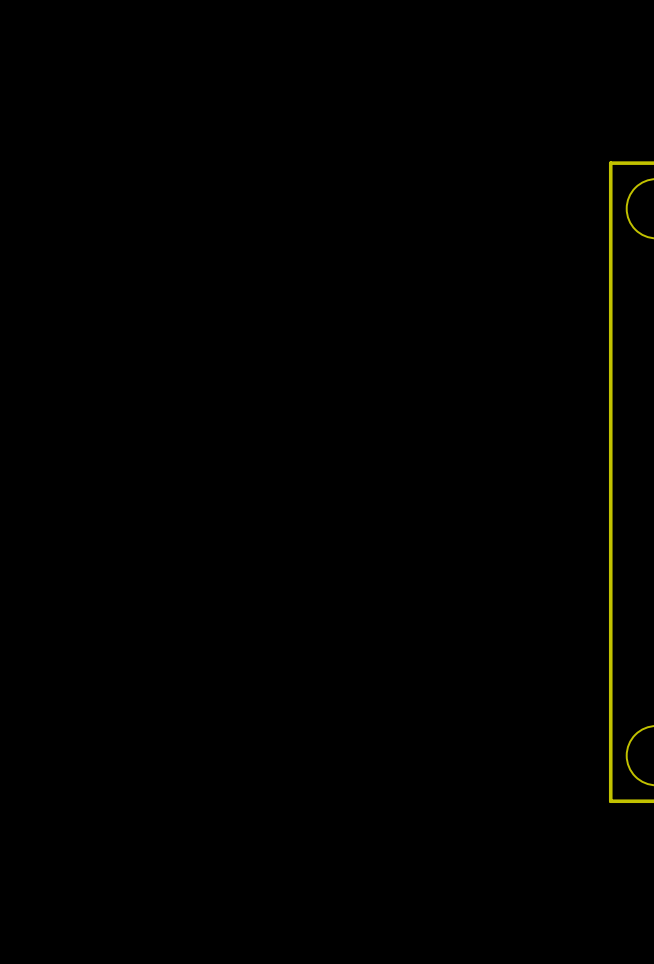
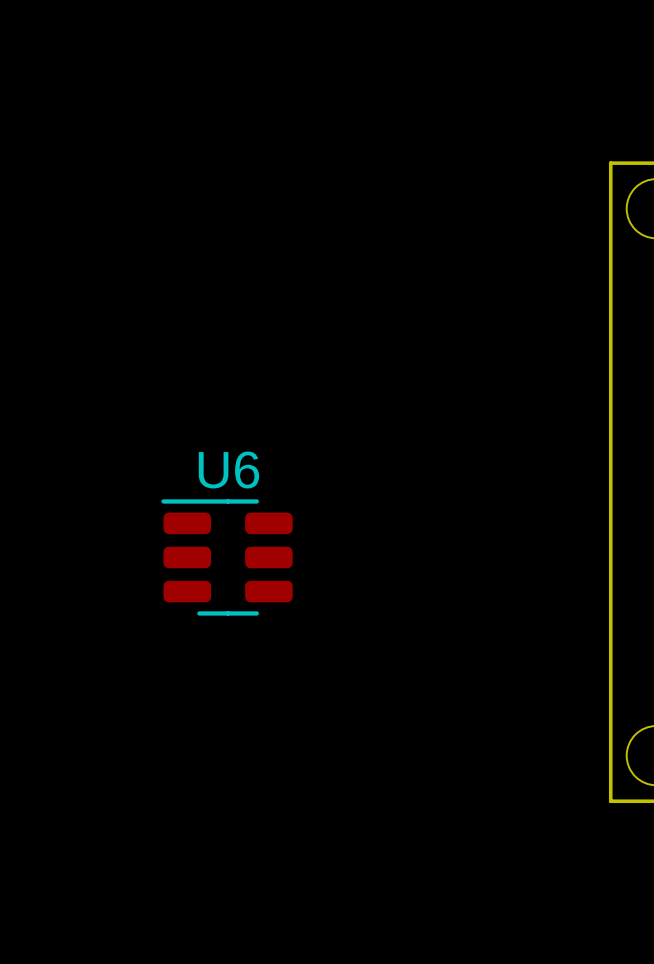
U6: none -> (227, 557)

